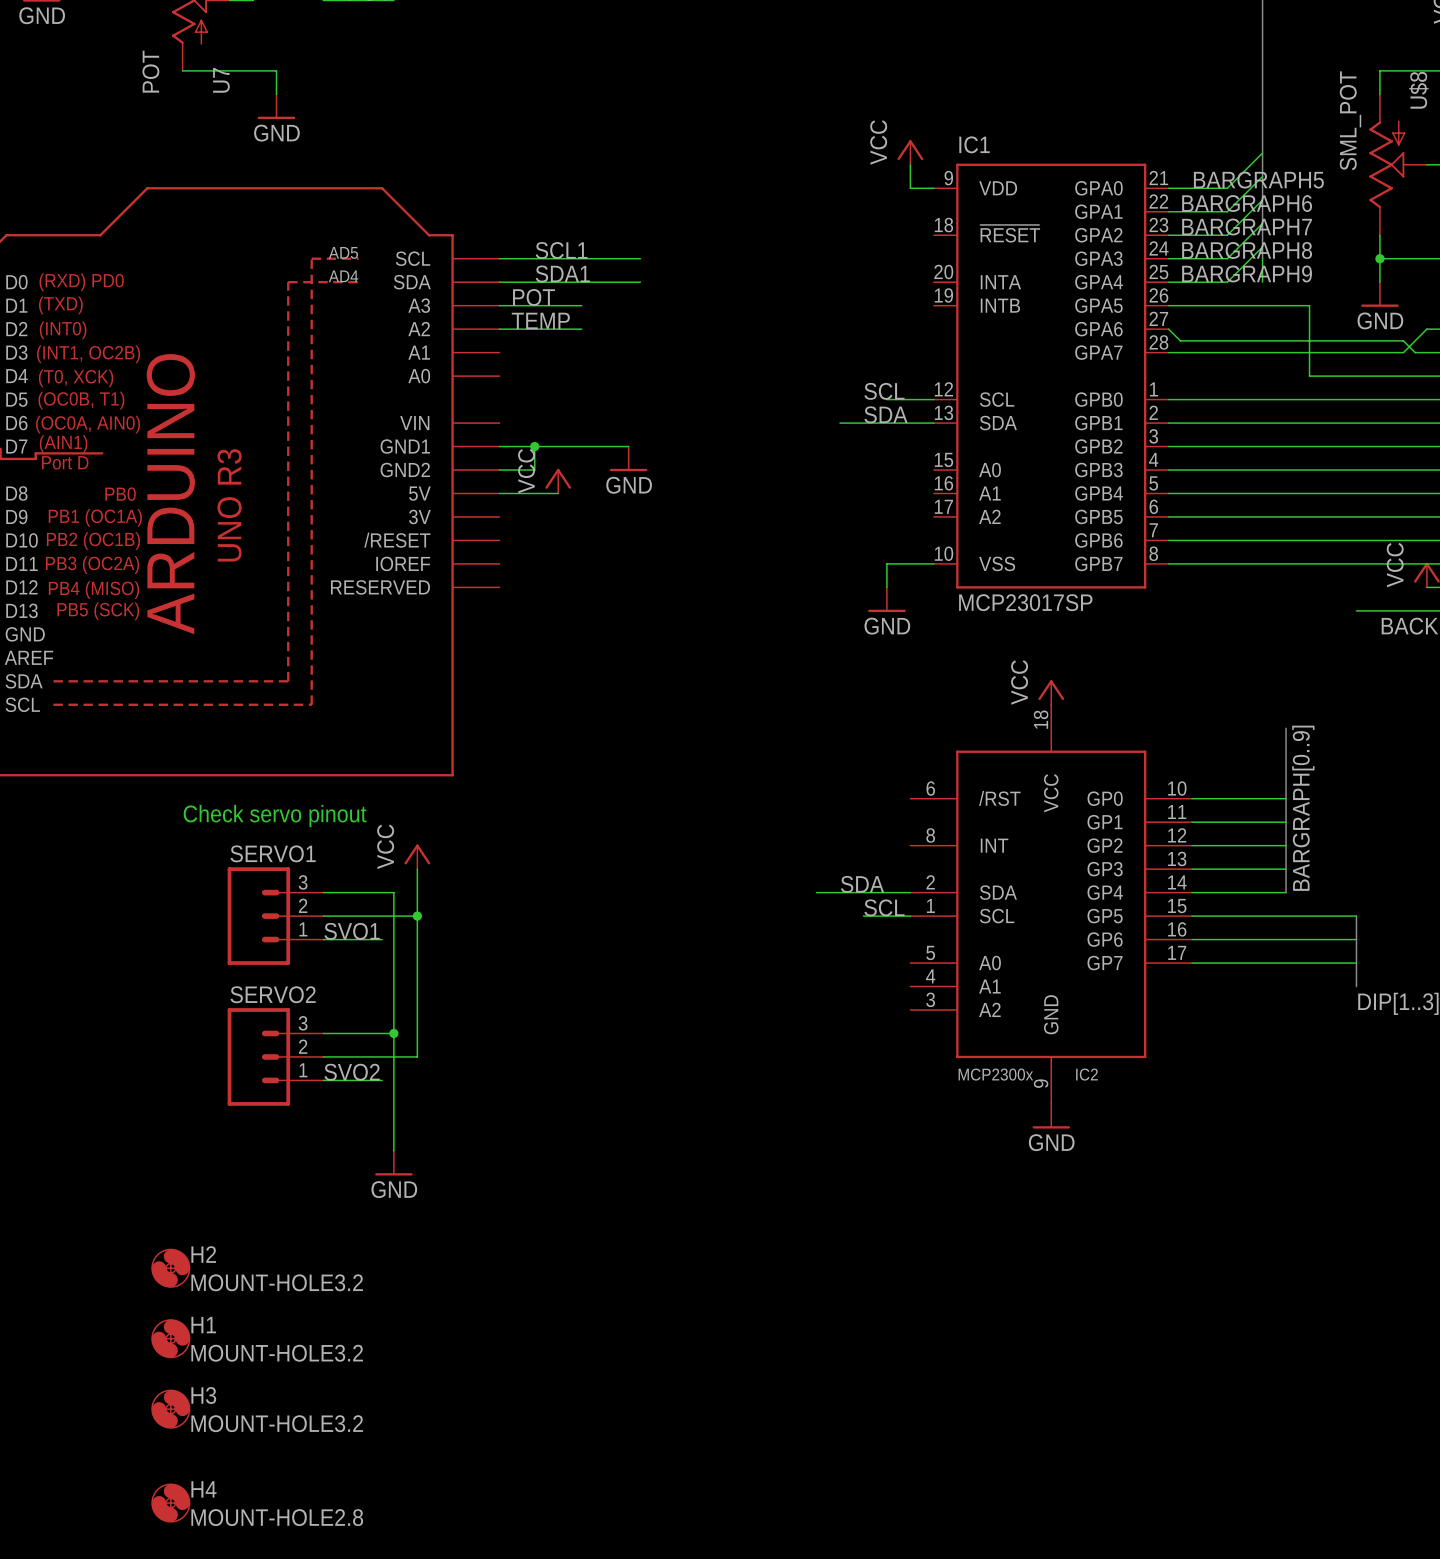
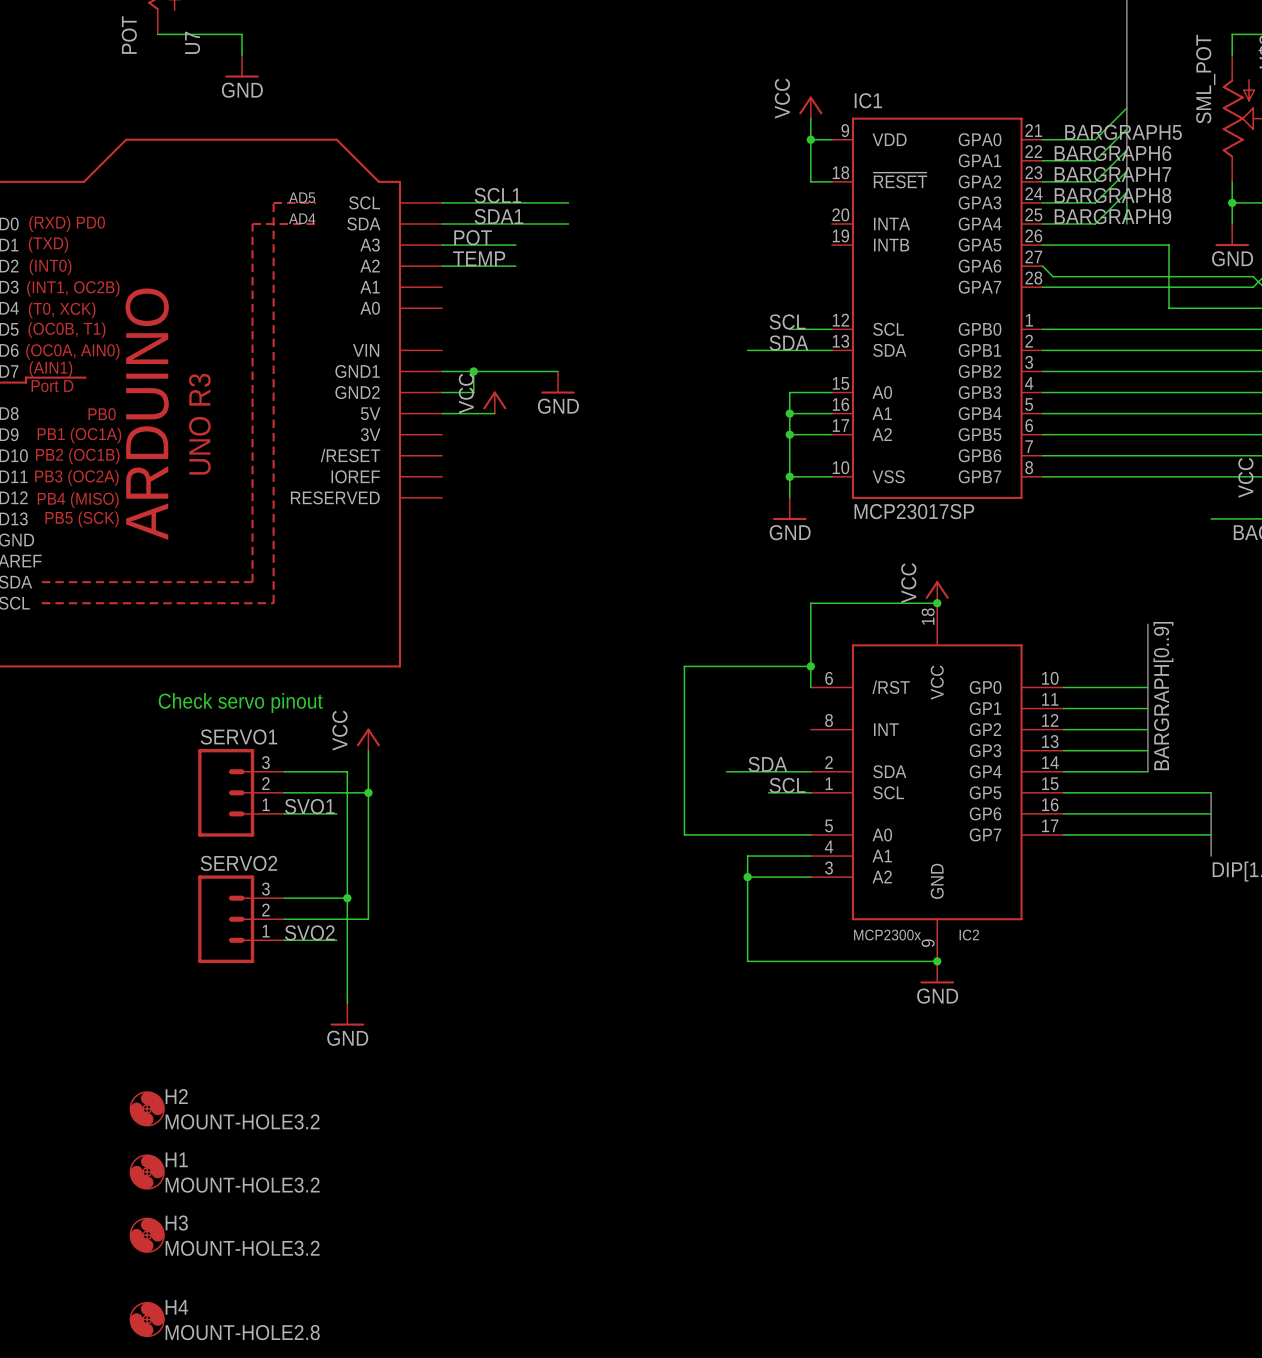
wire: none -> (810, 139) (810, 181) (831, 181)
junction: none -> (810, 139)
wire: none -> (831, 392) (789, 392) (789, 476)
wire: none -> (789, 413) (831, 413)
junction: none -> (789, 413)
wire: none -> (789, 434) (831, 434)
junction: none -> (789, 434)
junction: none -> (789, 476)
wire: none -> (937, 603) (810, 603) (810, 687)
junction: none -> (937, 603)
wire: none -> (810, 666) (684, 666) (684, 834) (810, 834)
junction: none -> (810, 666)
wire: none -> (810, 856) (747, 856) (747, 961) (937, 961)
wire: none -> (747, 877) (810, 877)
junction: none -> (747, 877)
junction: none -> (937, 961)

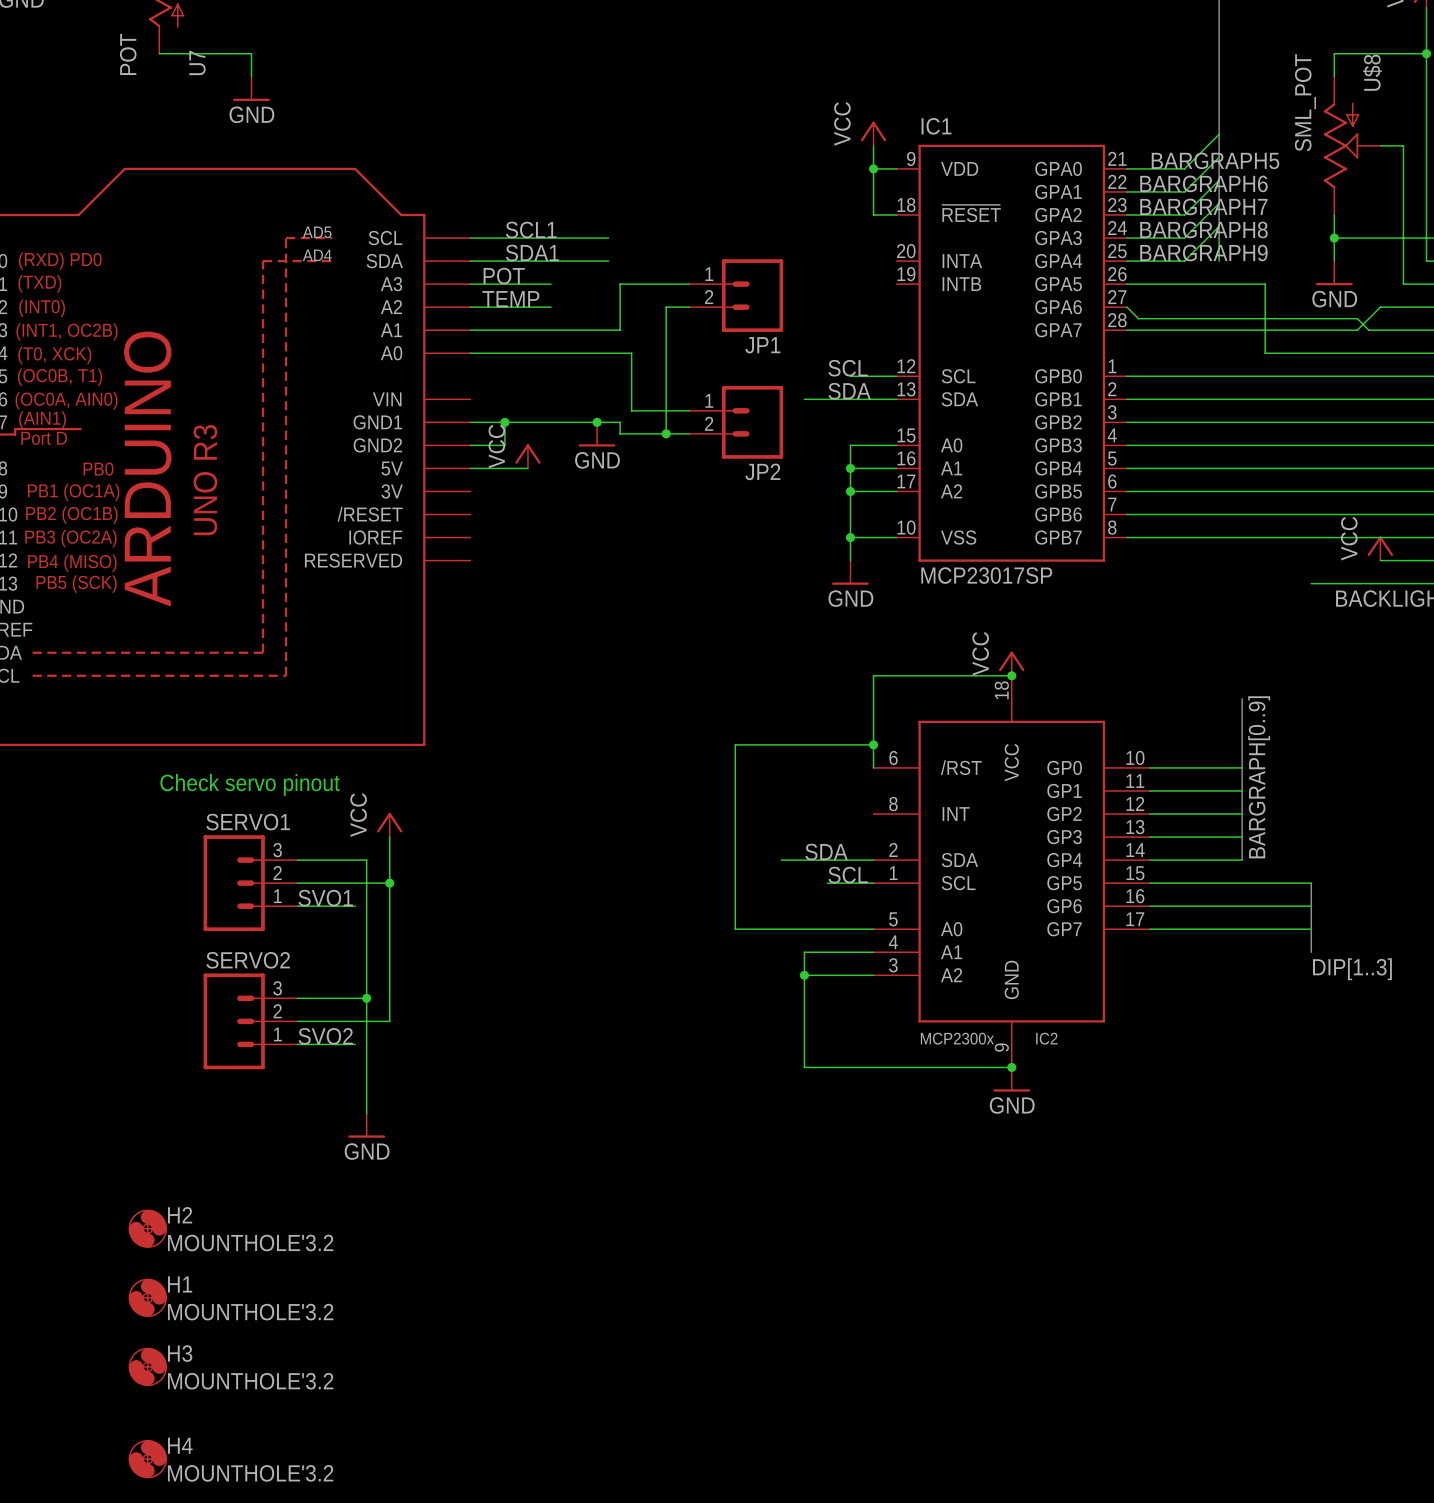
wire: none -> (689, 284) (620, 284) (620, 330) (470, 330)
JP1: none -> (736, 295)
wire: none -> (689, 307) (666, 307) (666, 433)
wire: none -> (470, 353) (631, 353) (631, 410) (689, 410)
wire: none -> (597, 422) (620, 422) (620, 433) (689, 433)
junction: none -> (597, 422)
JP2: none -> (736, 422)
junction: none -> (666, 433)
H2 value: MOUNT-HOLE3.2 (242, 1121) -> MOUNTHOLE'3.2 (250, 1243)
H1 value: MOUNT-HOLE3.2 (242, 1185) -> MOUNTHOLE'3.2 (250, 1312)
H3 value: MOUNT-HOLE3.2 (242, 1248) -> MOUNTHOLE'3.2 (250, 1381)
H4 value: MOUNT-HOLE2.8 (242, 1332) -> MOUNTHOLE'3.2 (250, 1473)

